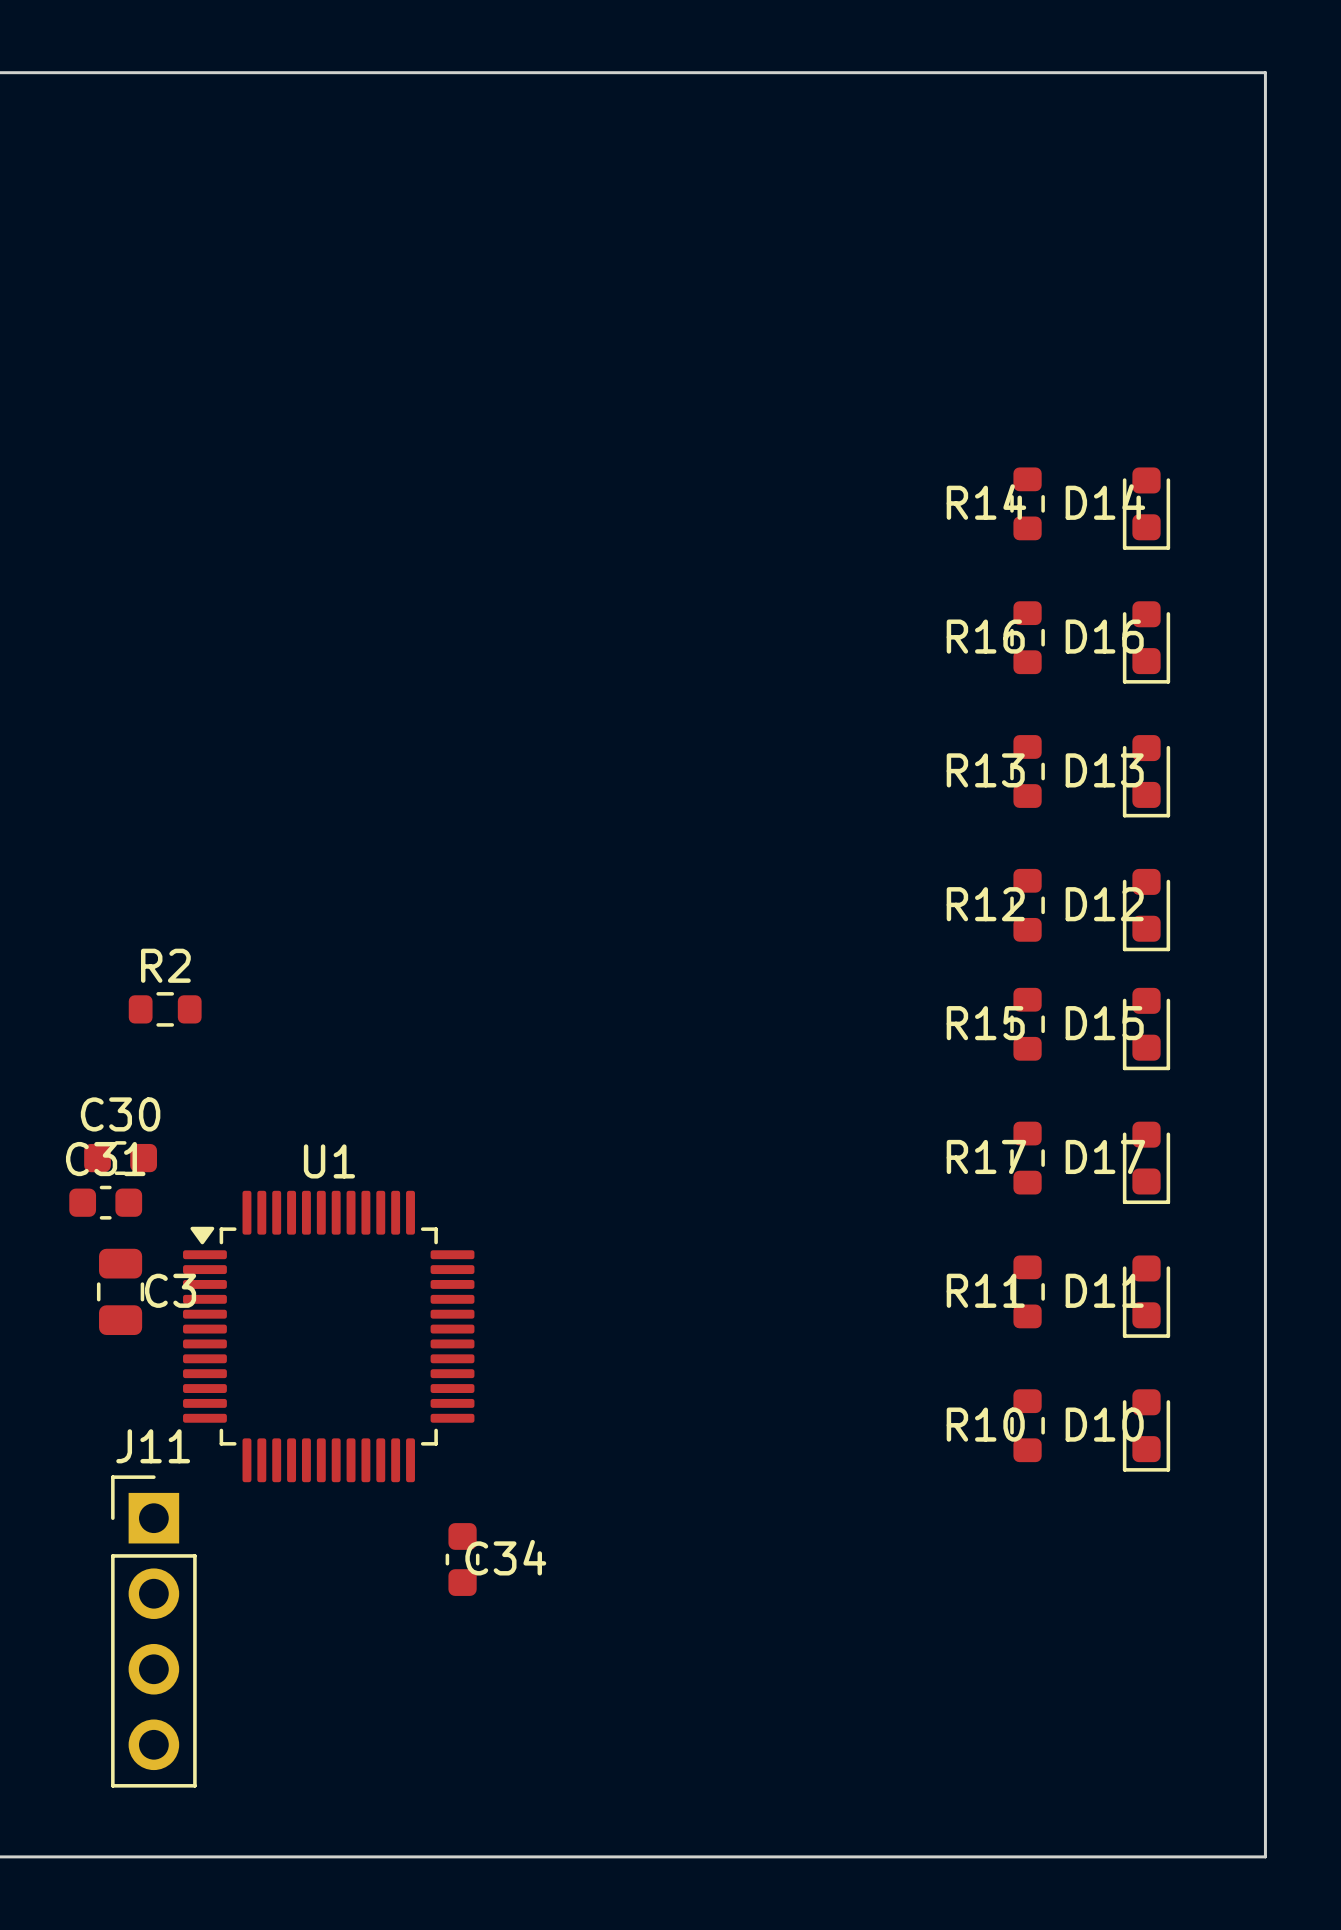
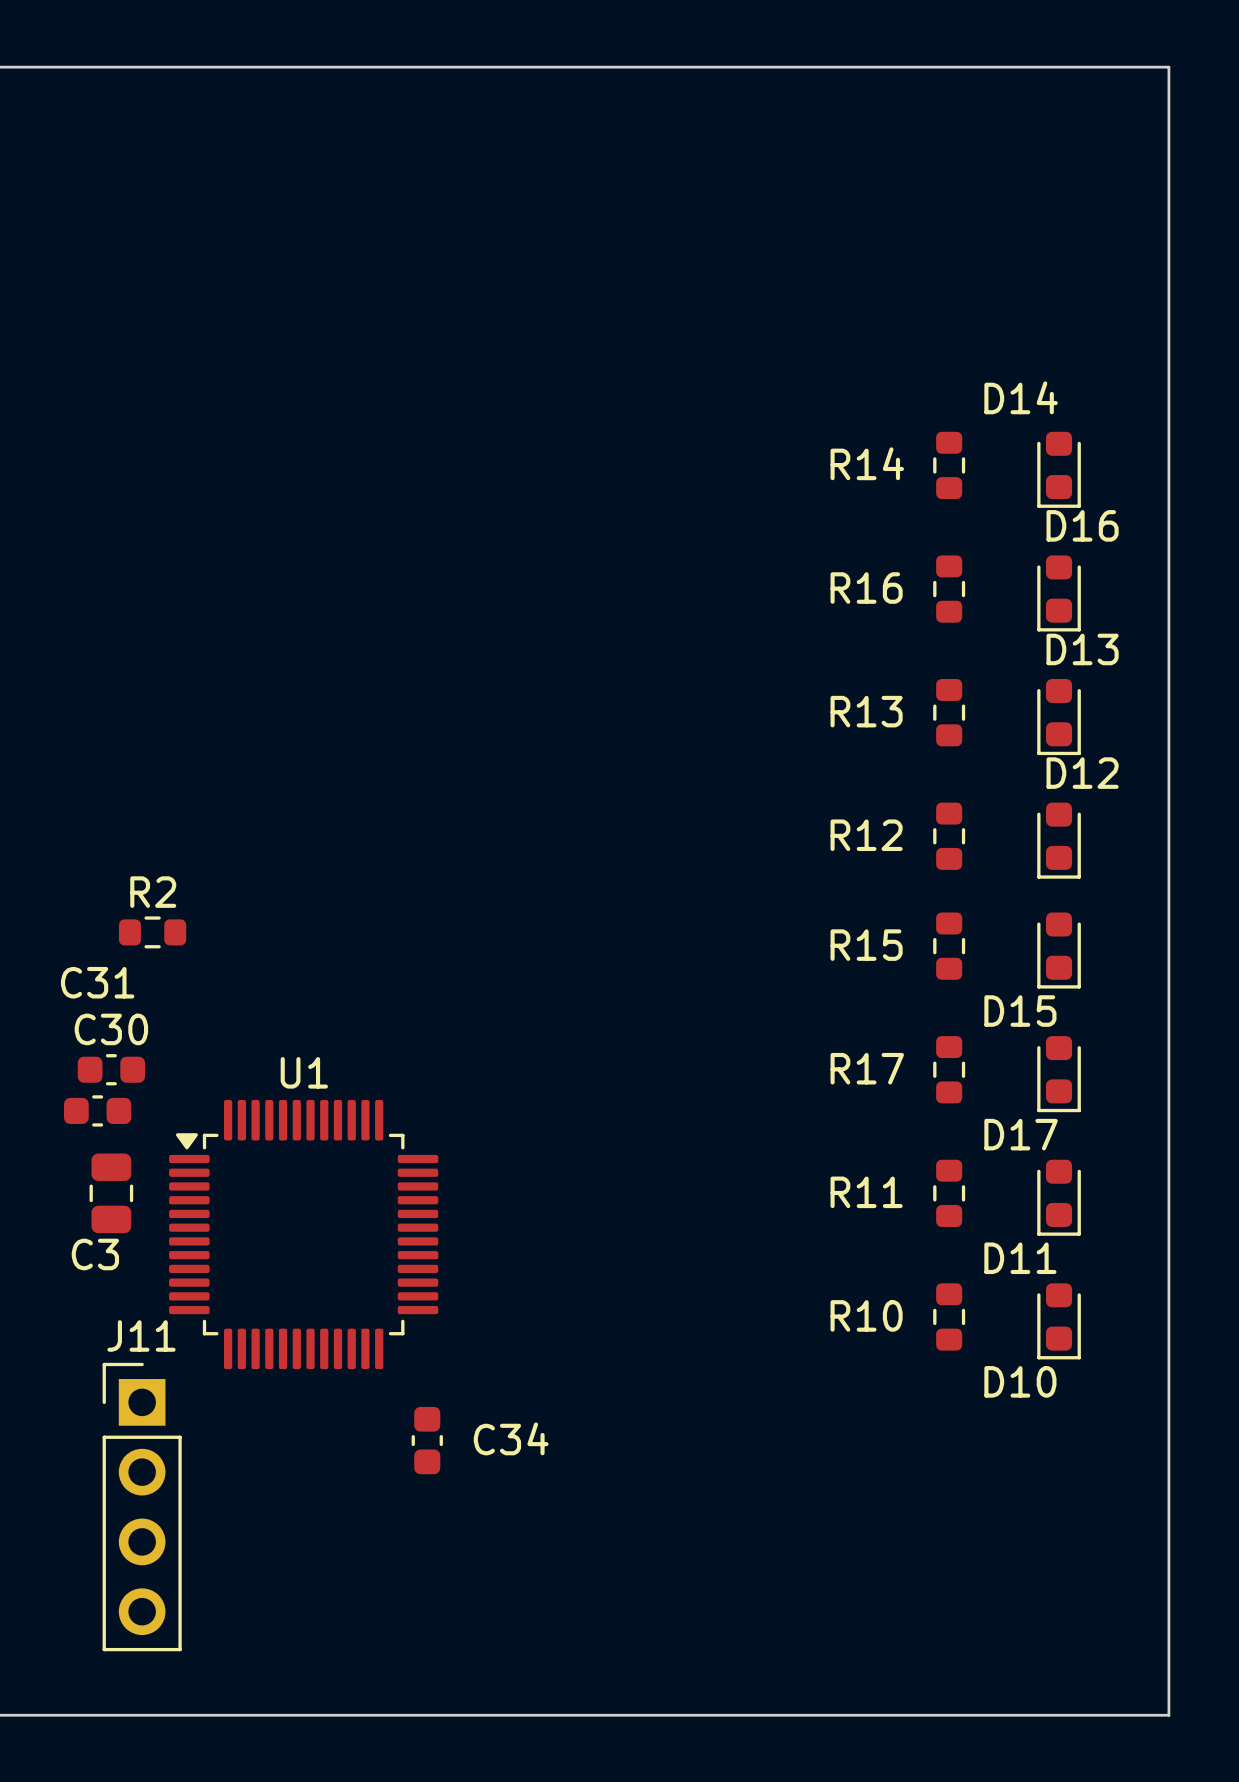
R14 name position: R14 (986, 502) -> R14 (867, 463)
D14 name position: D14 (1105, 502) -> D14 (1021, 397)
R16 name position: R16 (985, 636) -> R16 (866, 588)
D16 name position: D16 (1104, 636) -> D16 (1082, 525)
R13 name position: R13 (985, 770) -> R13 (866, 711)
D13 name position: D13 (1104, 770) -> D13 (1082, 649)
R12 name position: R12 (985, 904) -> R12 (866, 835)
D12 name position: D12 (1104, 904) -> D12 (1082, 773)
R15 name position: R15 (985, 1023) -> R15 (866, 945)
D15 name position: D15 (1104, 1023) -> D15 (1020, 1011)
R17 name position: R17 (986, 1156) -> R17 (867, 1068)
D17 name position: D17 (1105, 1156) -> D17 (1021, 1134)
C31 name position: C31 (105, 1159) -> C31 (97, 982)
C3 name position: C3 (170, 1290) -> C3 (95, 1254)
R11 name position: R11 (985, 1290) -> R11 (866, 1192)
D11 name position: D11 (1104, 1290) -> D11 (1020, 1258)
R10 name position: R10 (985, 1424) -> R10 (866, 1315)
D10 name position: D10 (1104, 1424) -> D10 (1020, 1381)
C34 name position: C34 (505, 1557) -> C34 (511, 1438)

